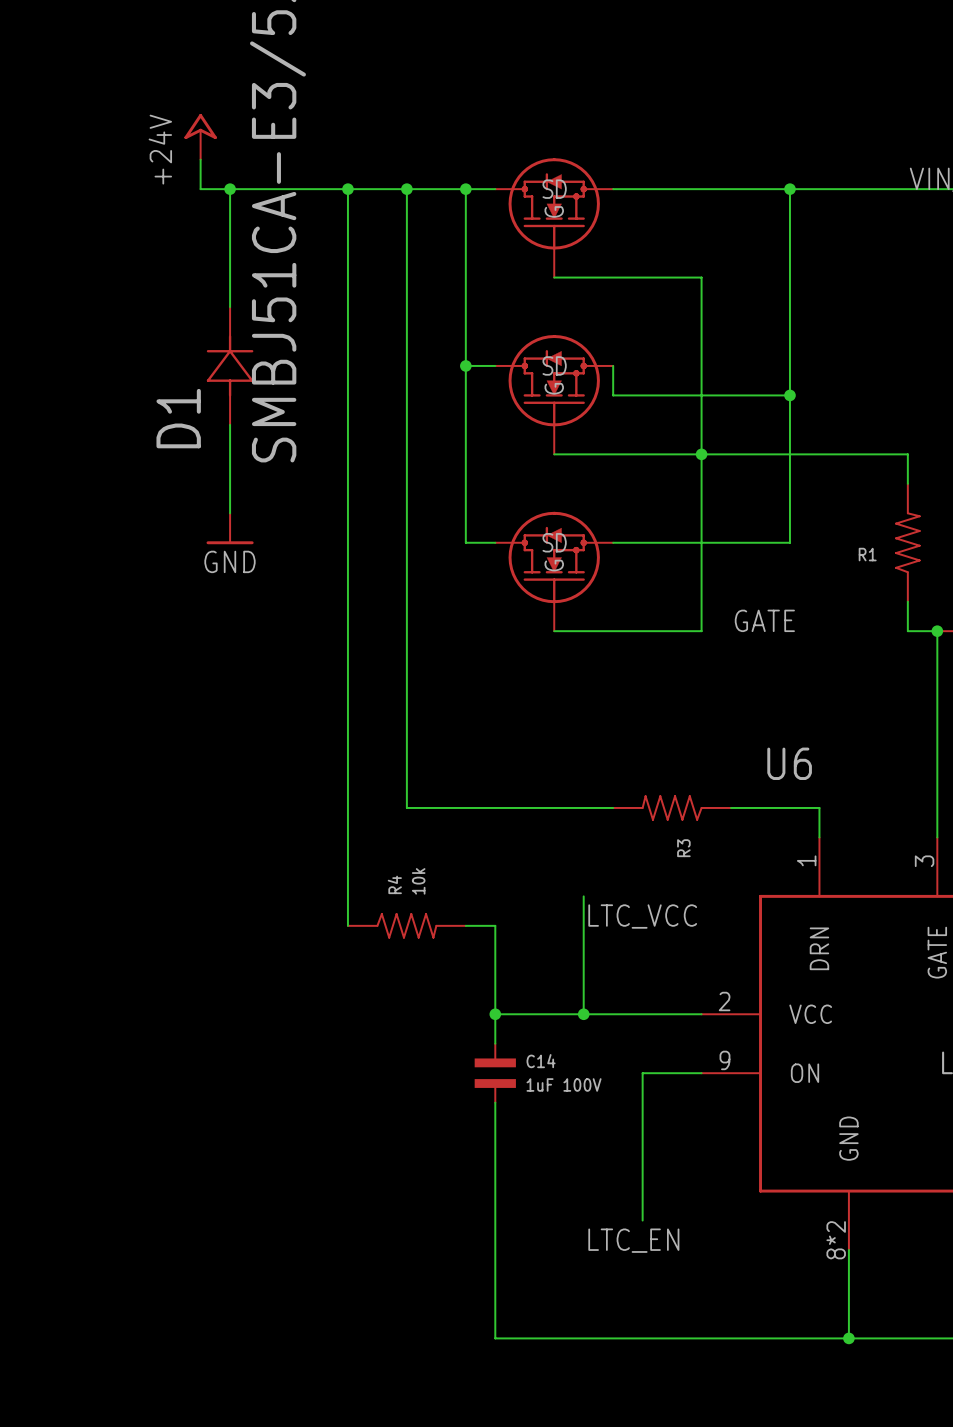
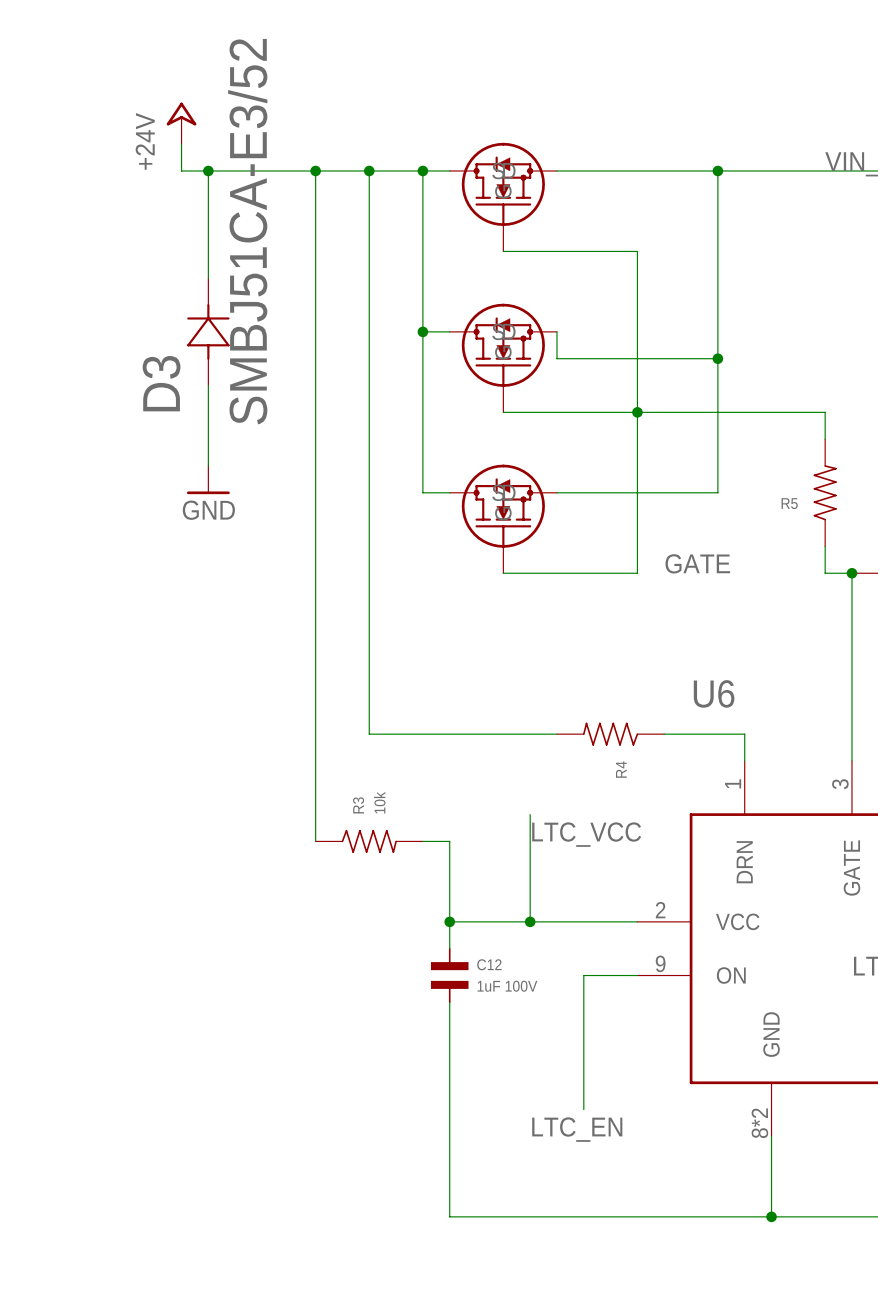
D1 name: D1 (178, 418) -> D3 (161, 383)
R1 name: R1 (867, 554) -> R5 (789, 503)
R3 name: R3 (683, 848) -> R4 (621, 769)
R4 name: R4 (394, 884) -> R3 (358, 805)
C14 name: C14 (541, 1061) -> C12 (489, 964)

